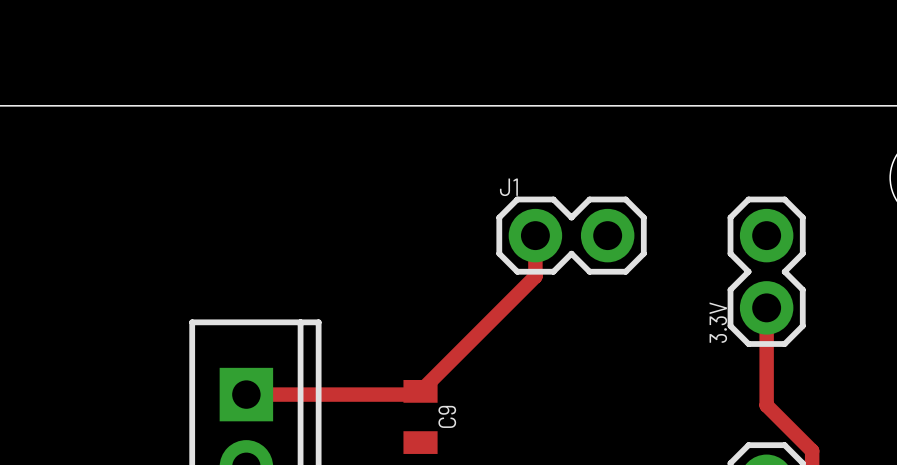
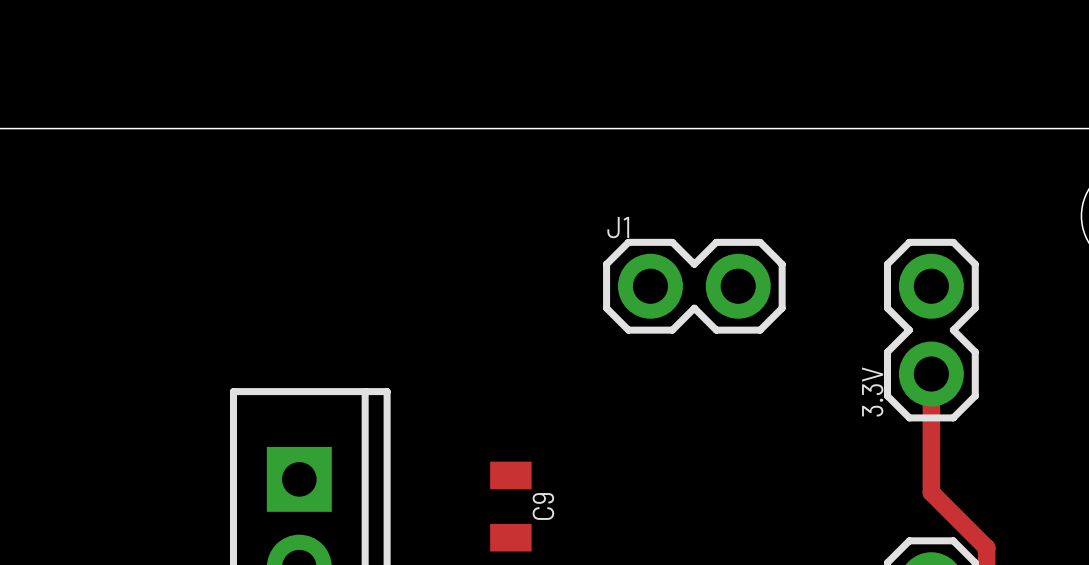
track: (535, 235) (535, 276) (417, 394) (246, 394) -> none

